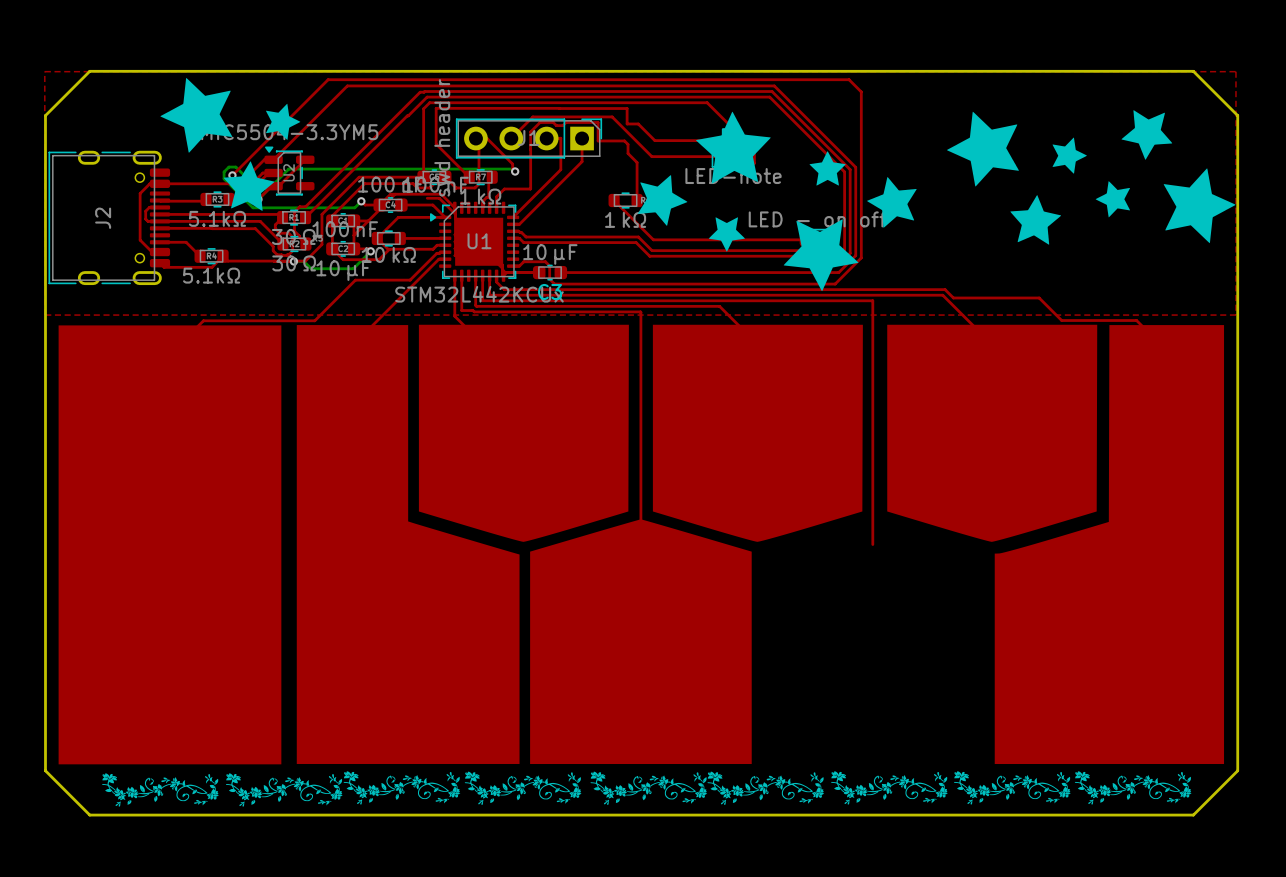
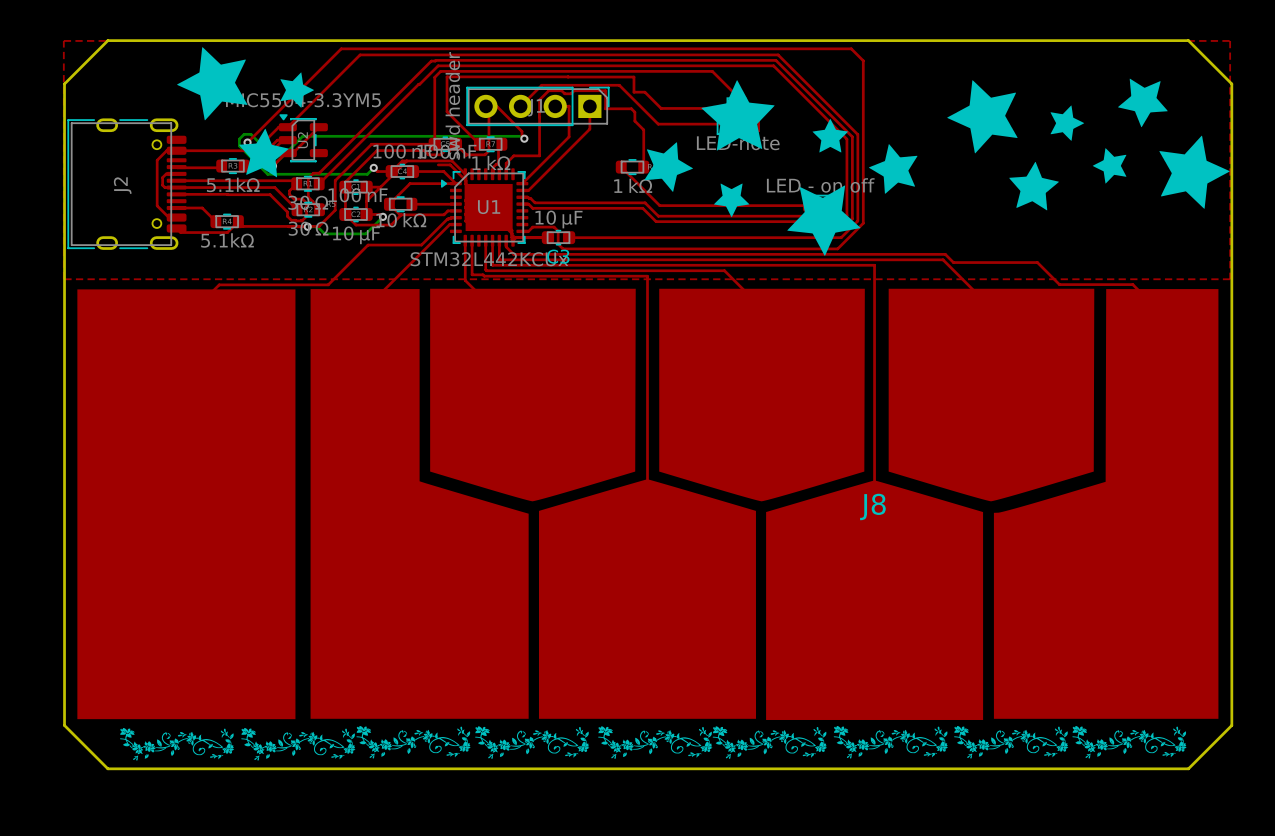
J8: none -> (874, 600)

